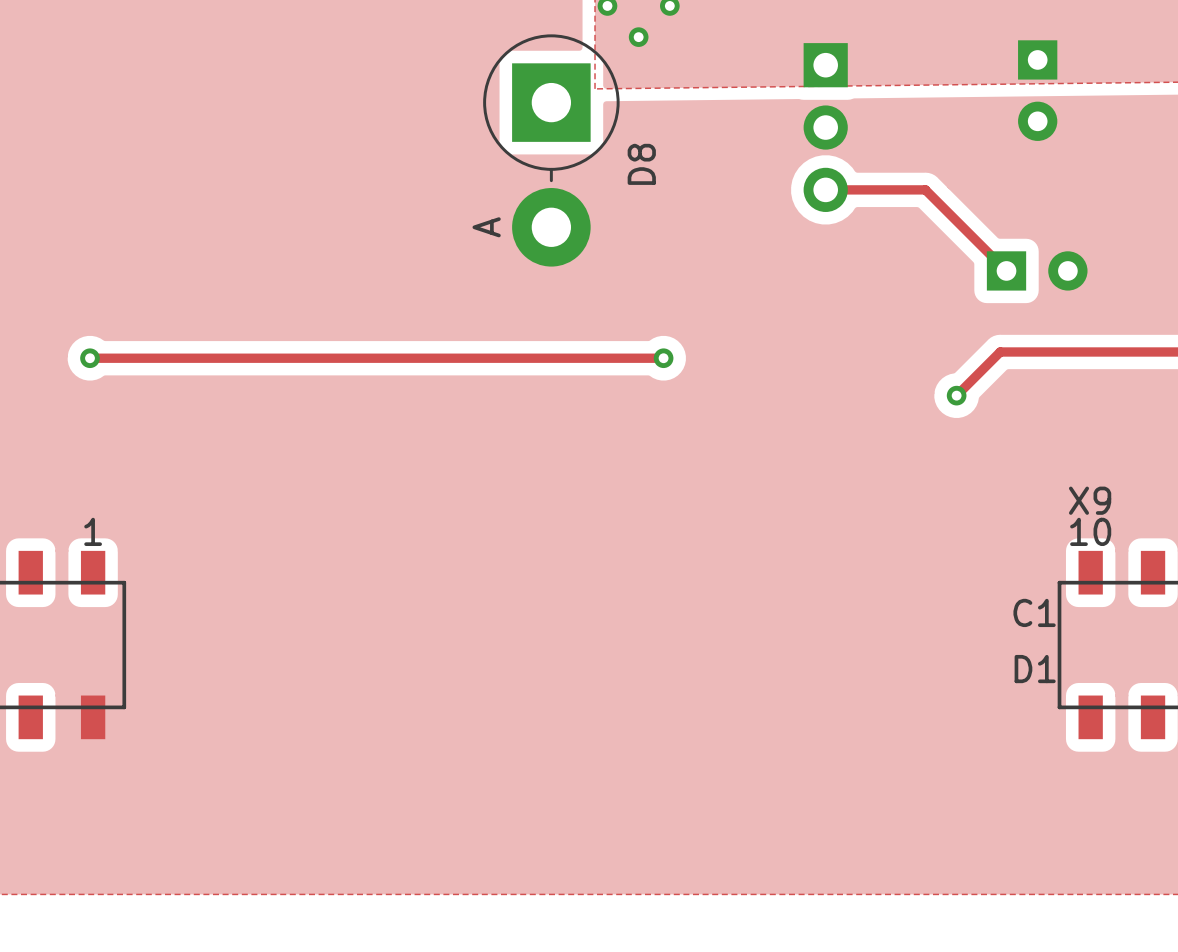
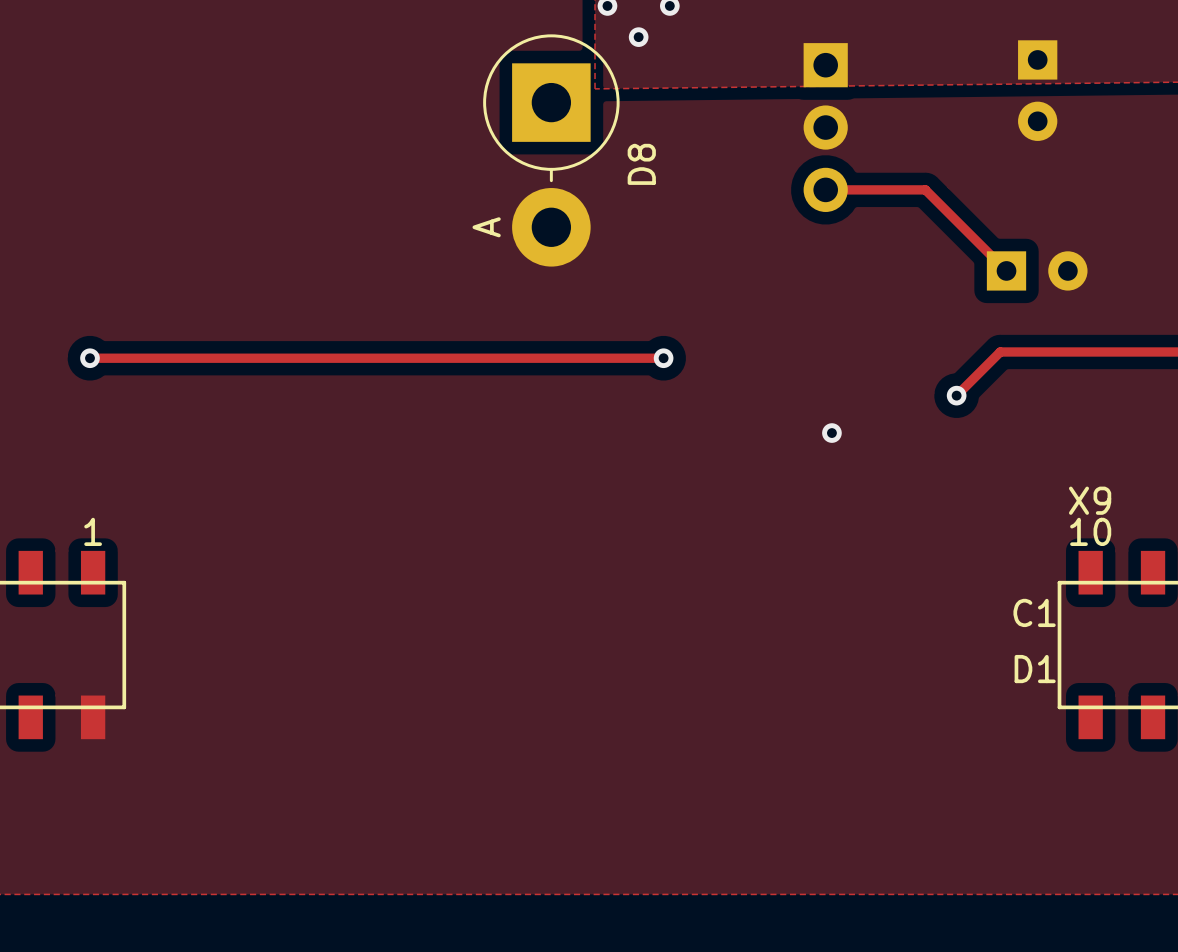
via: none -> (831, 433)

